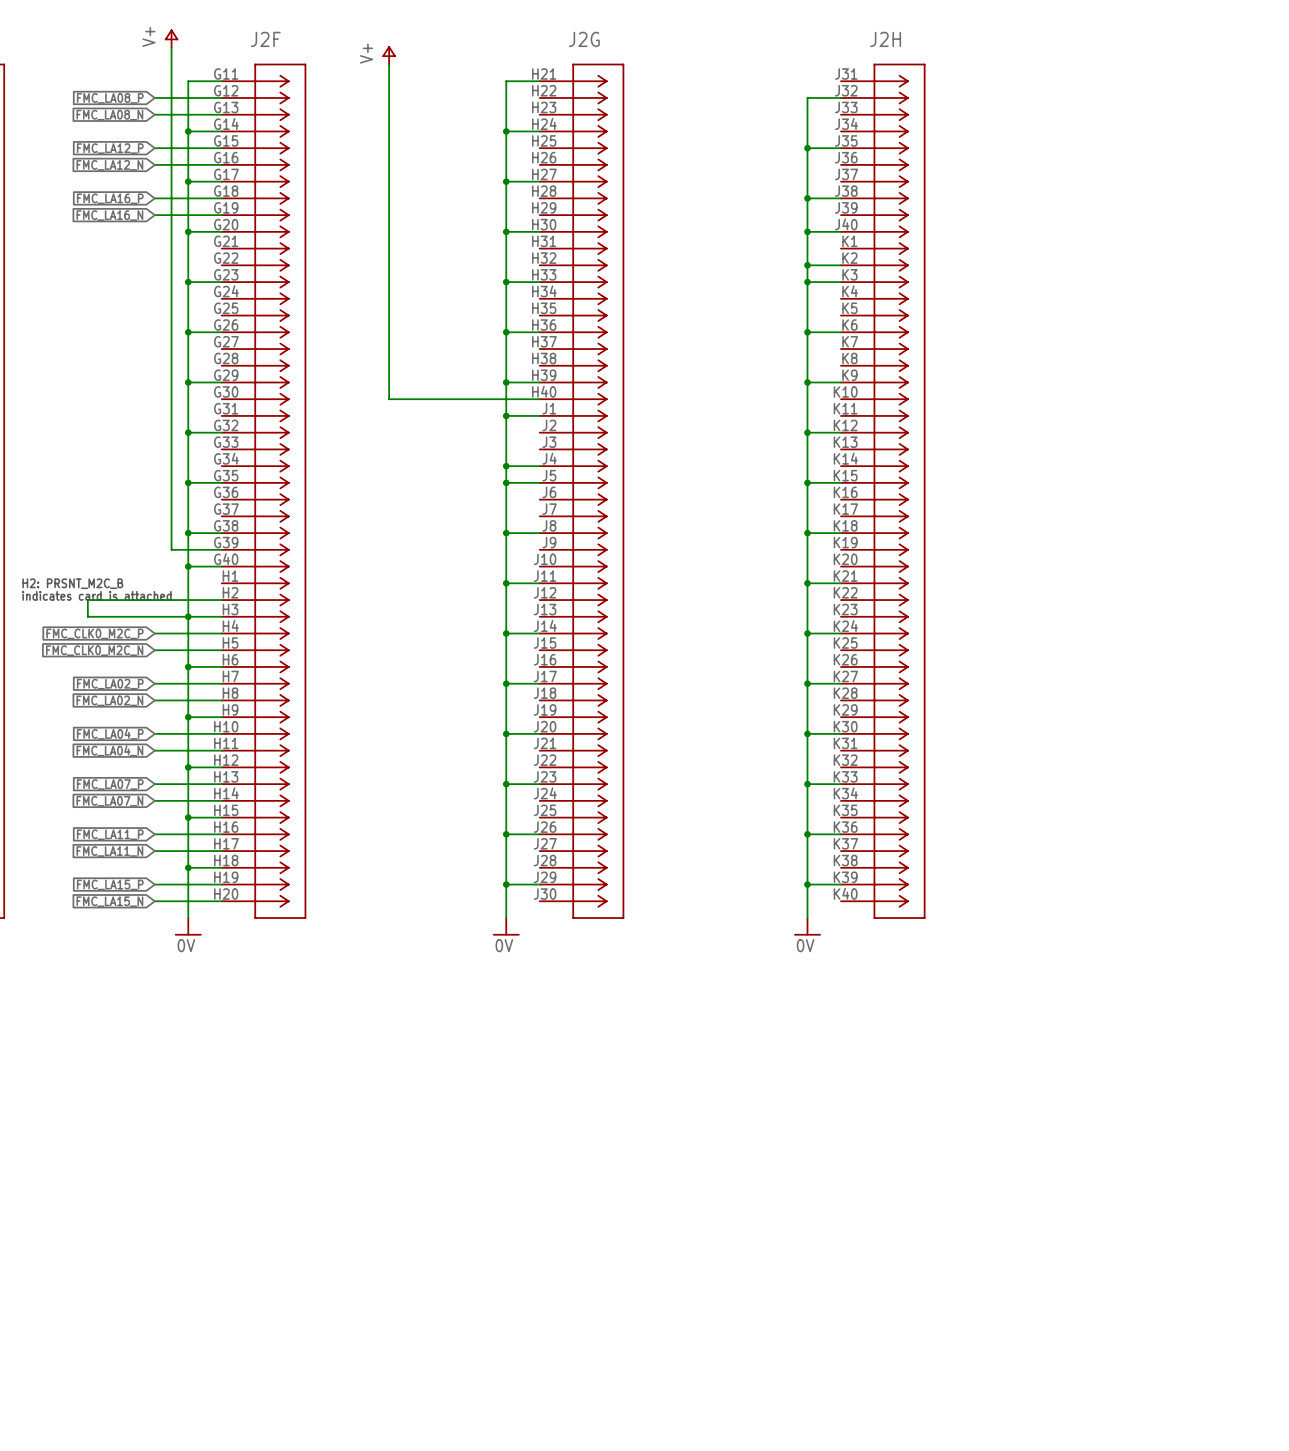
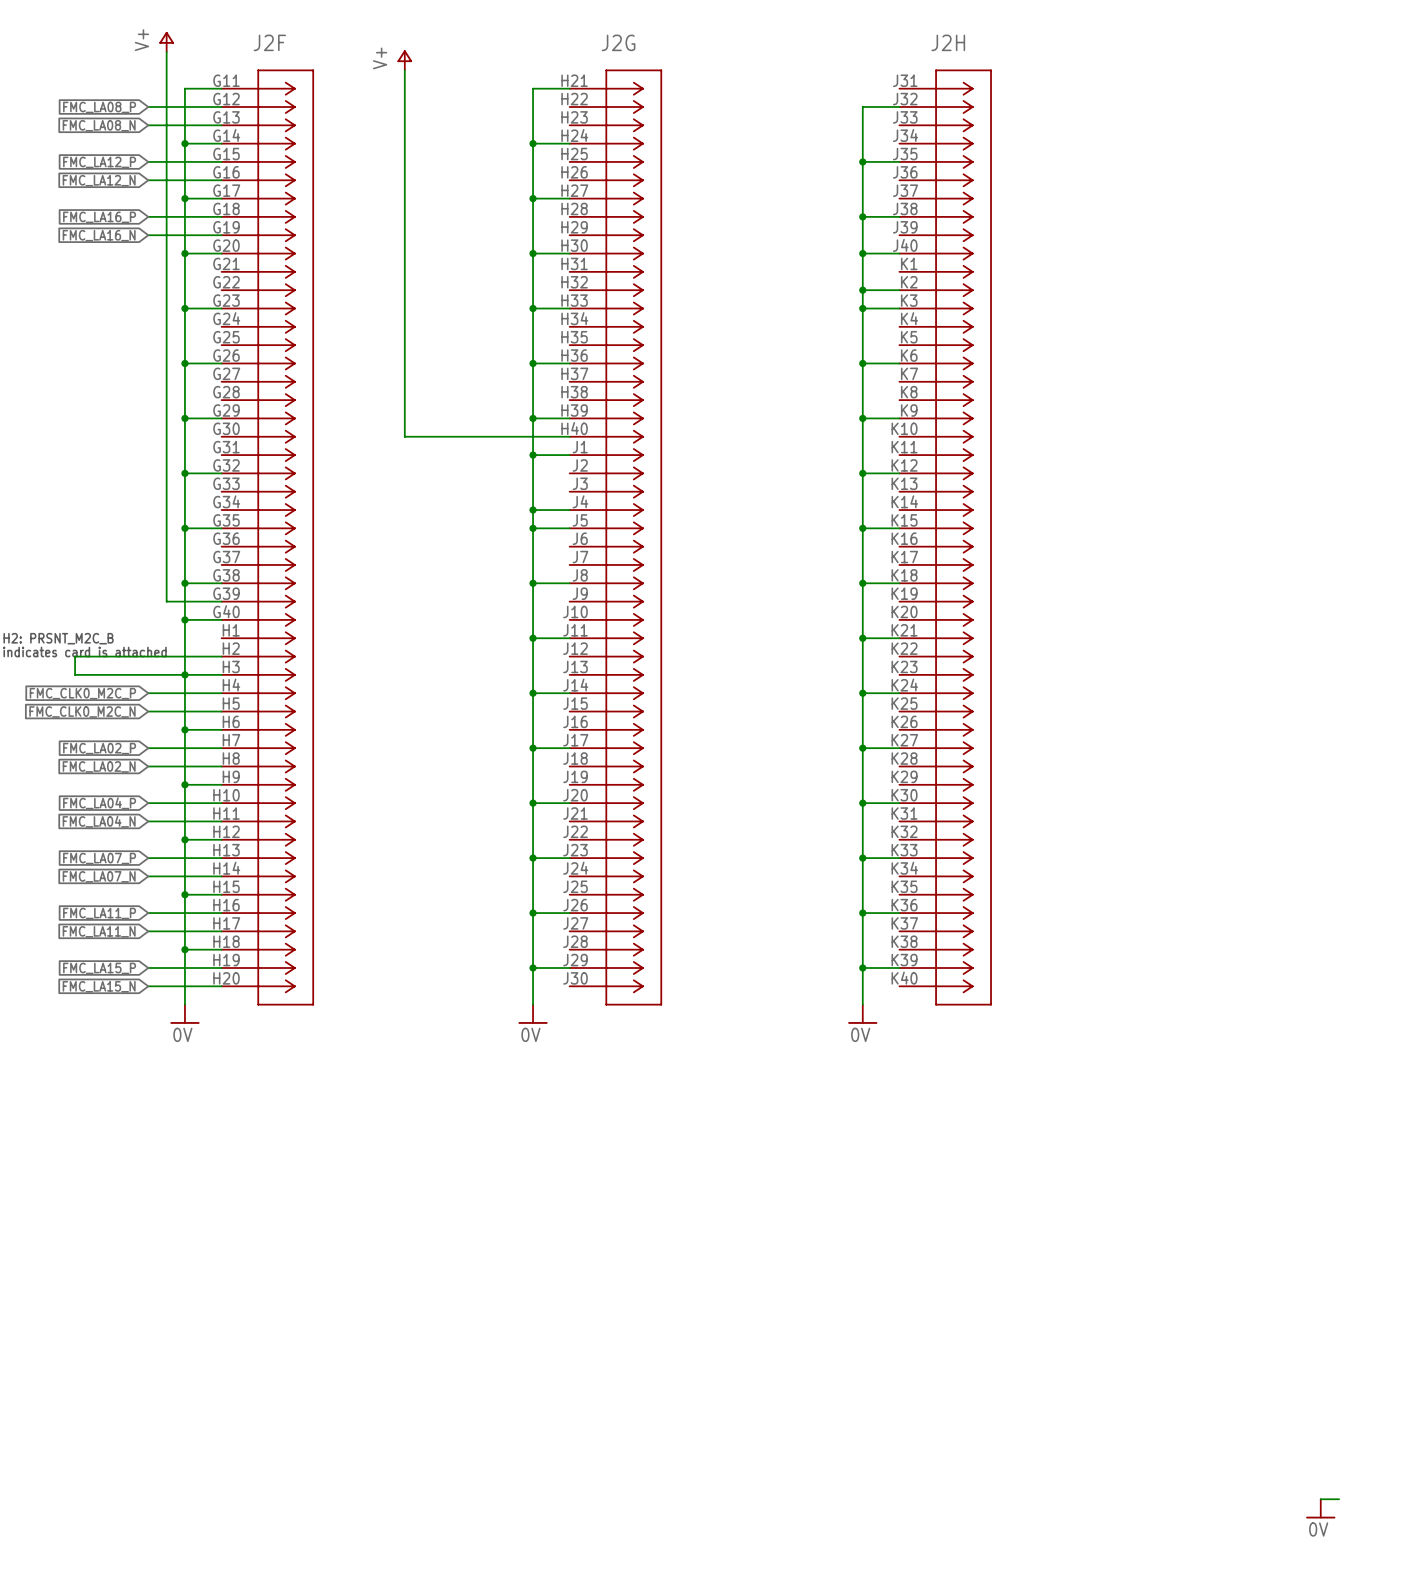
wire: none -> (1320, 1499) (1339, 1499)
power symbol: none -> 0V (1320, 1508)

